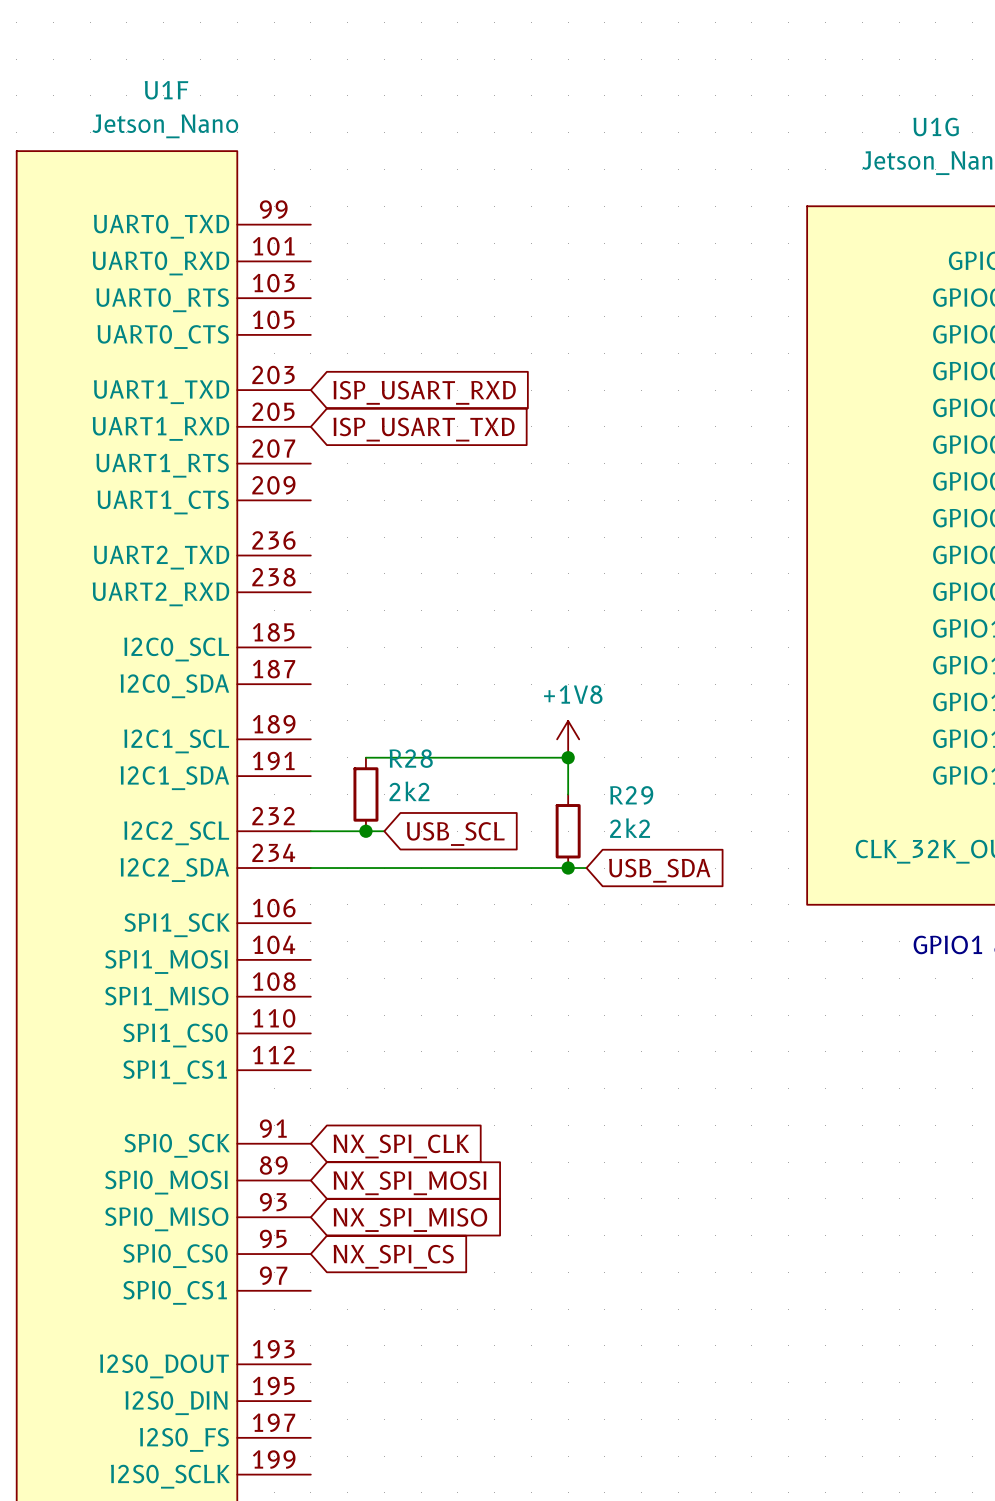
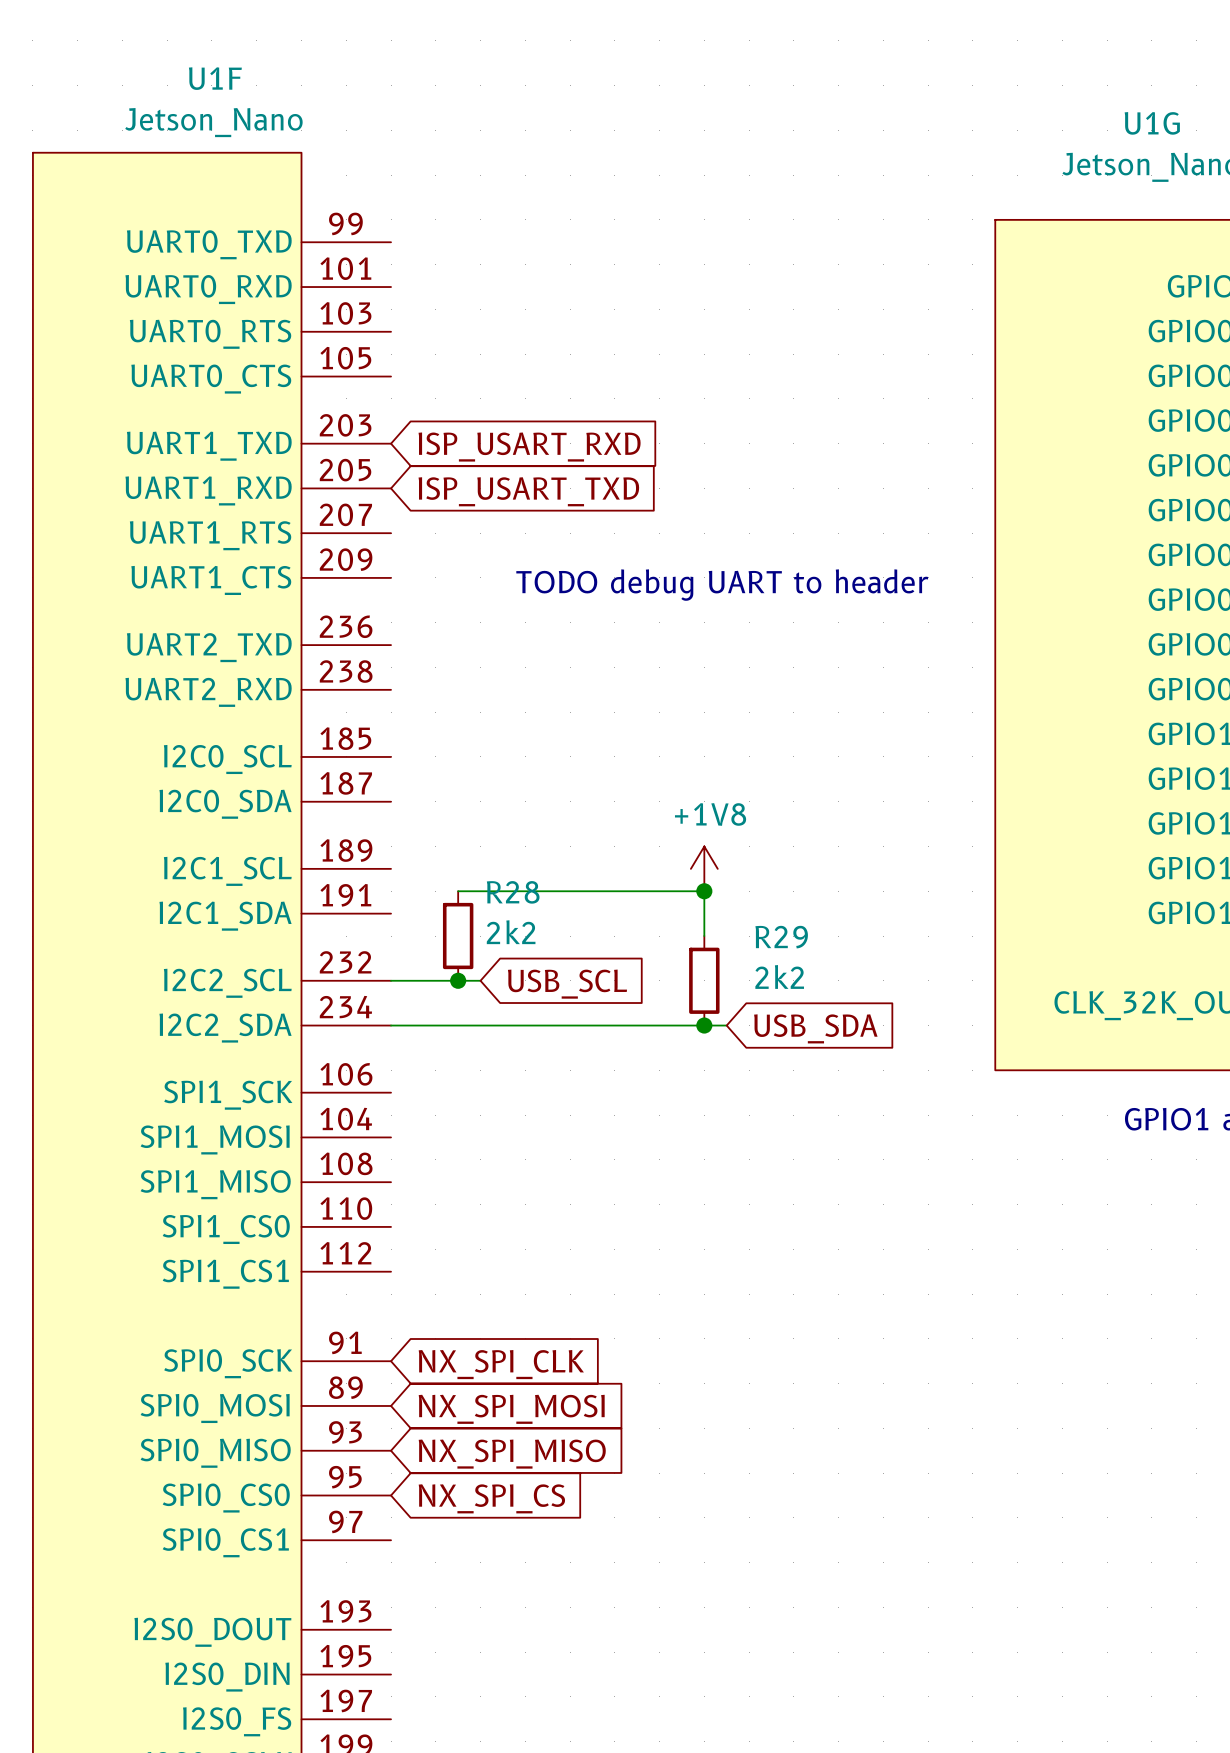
text: none -> TODO debug UART to header (722, 585)

